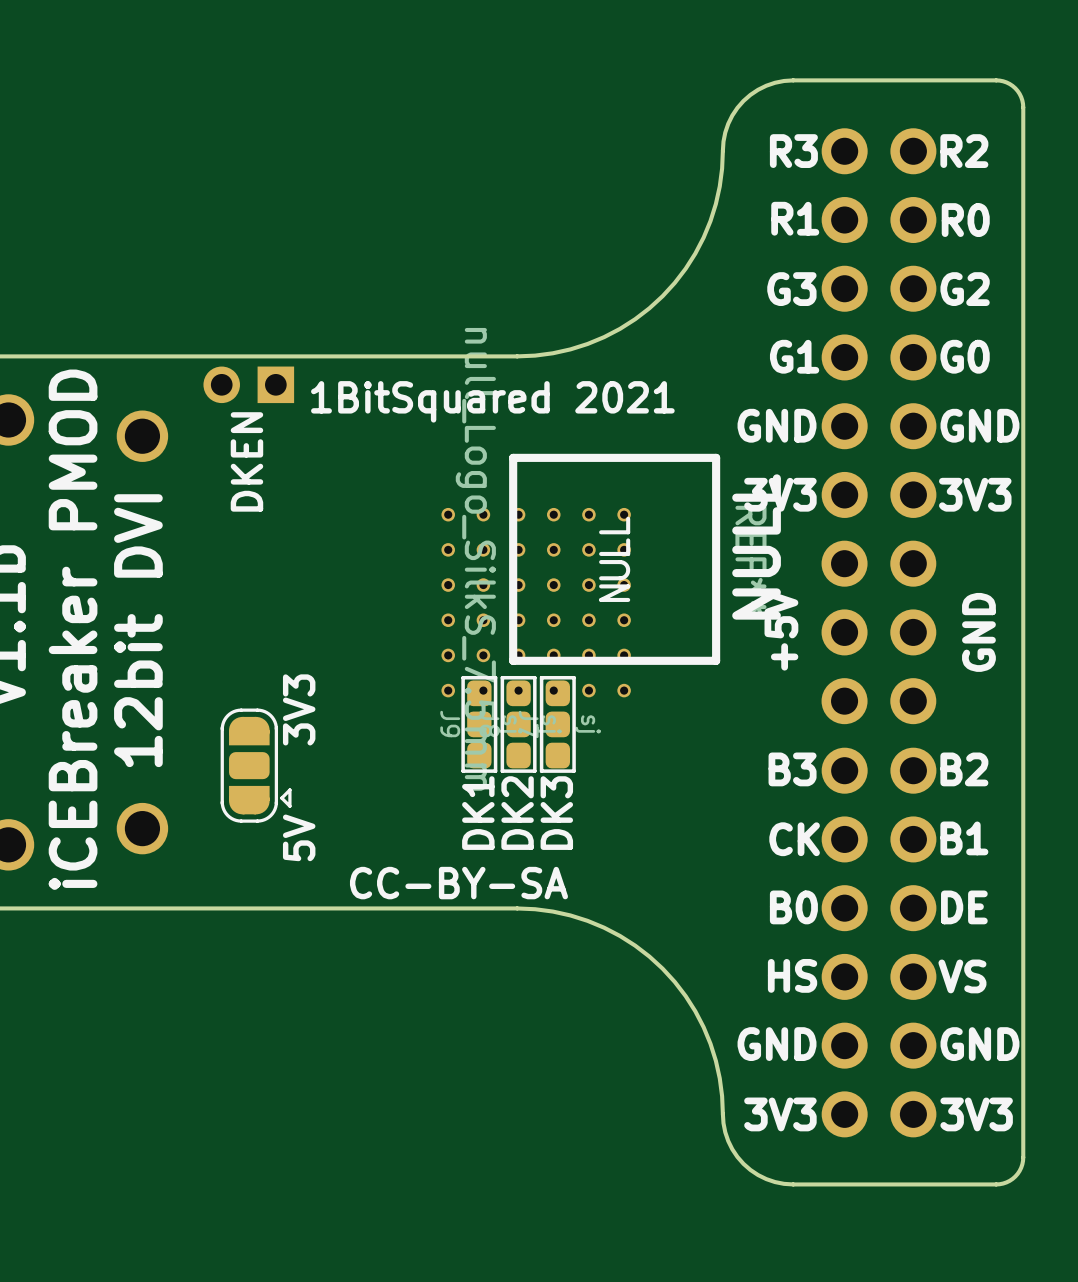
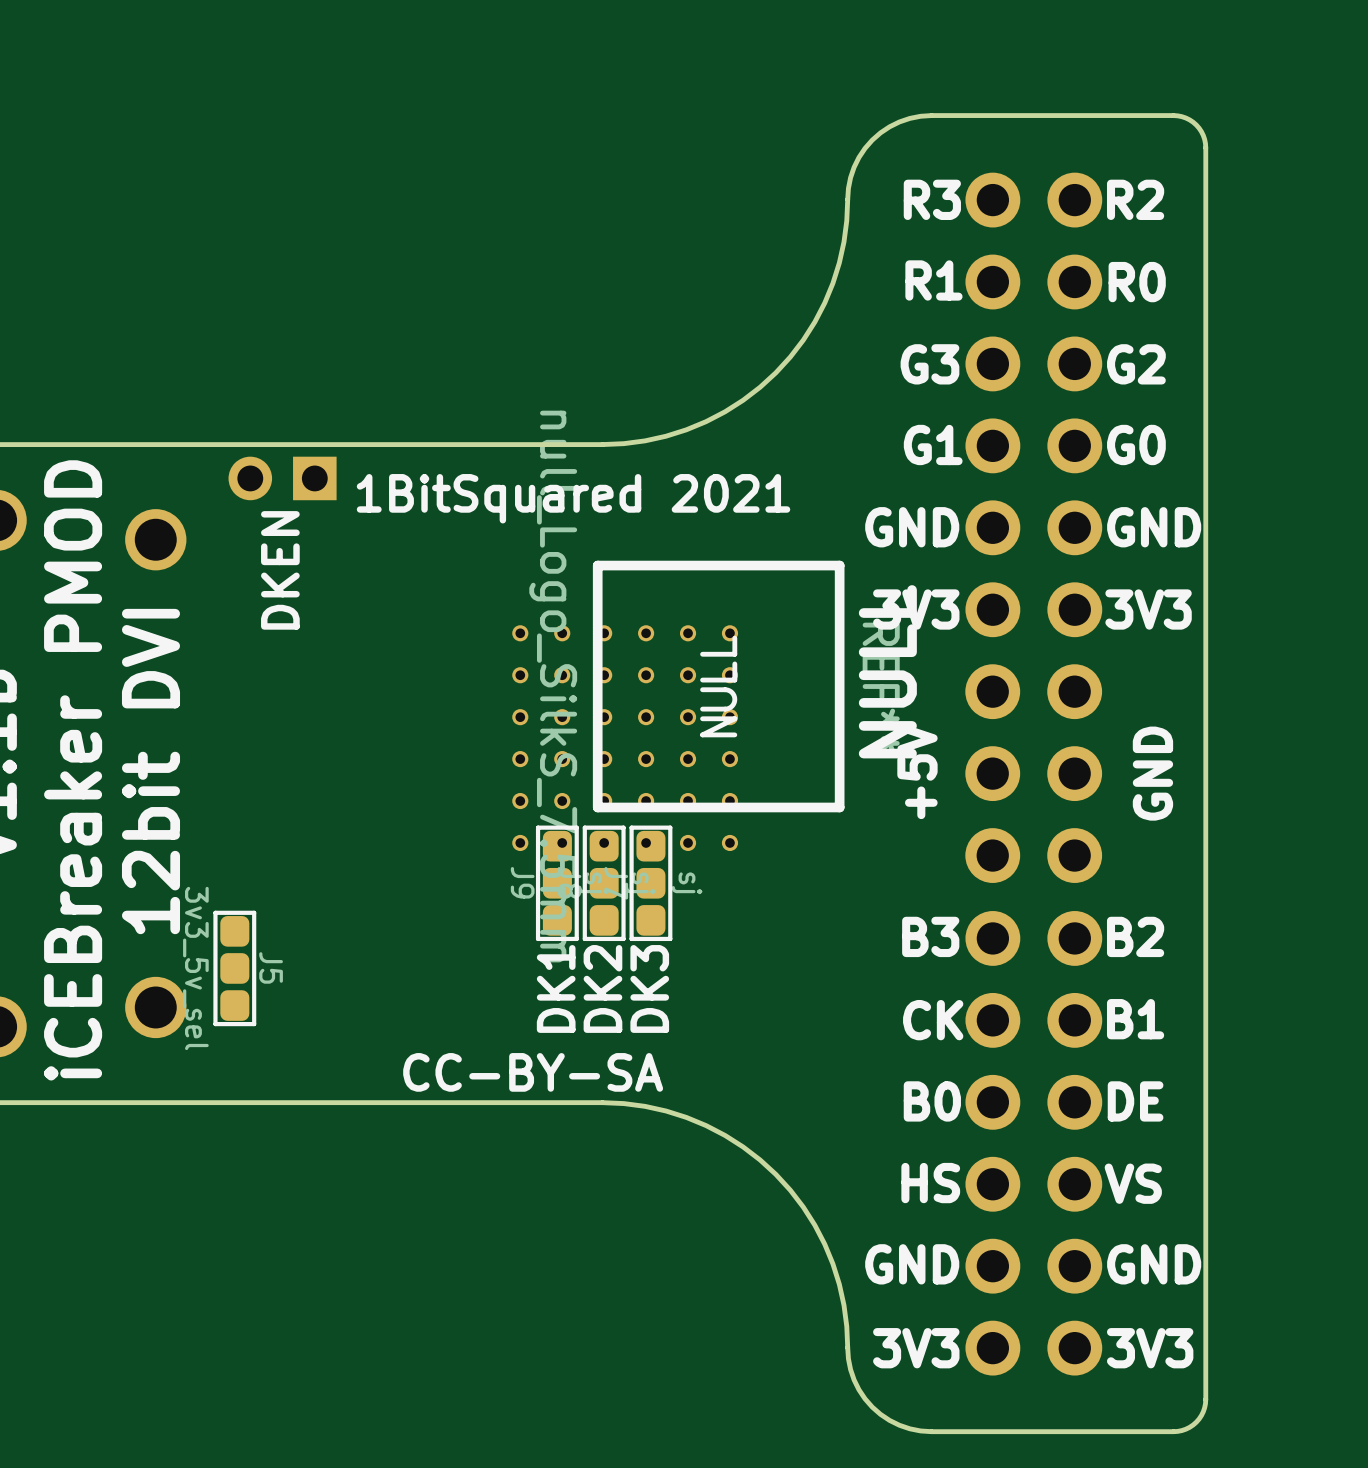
text: 3V3 (299, 709) -> none
part: (256, 765) -> none
J5: none -> 3v3_5v_sel (234, 968)
text: 5V (299, 837) -> none

